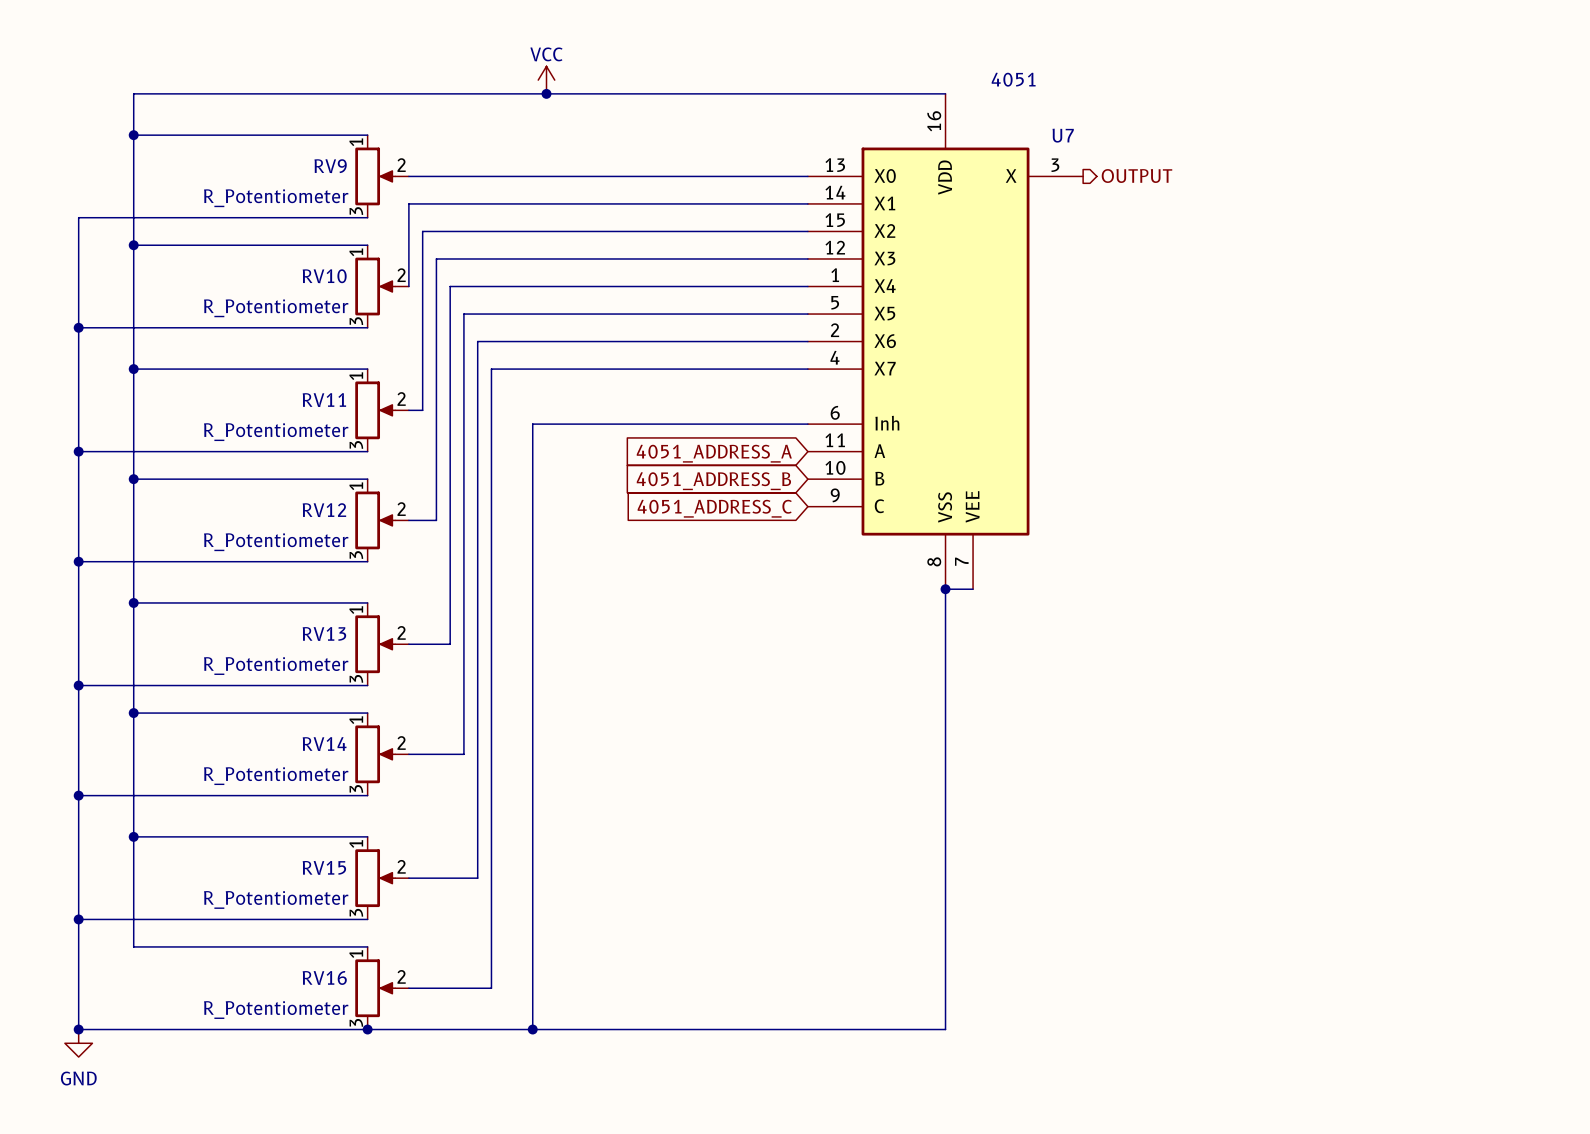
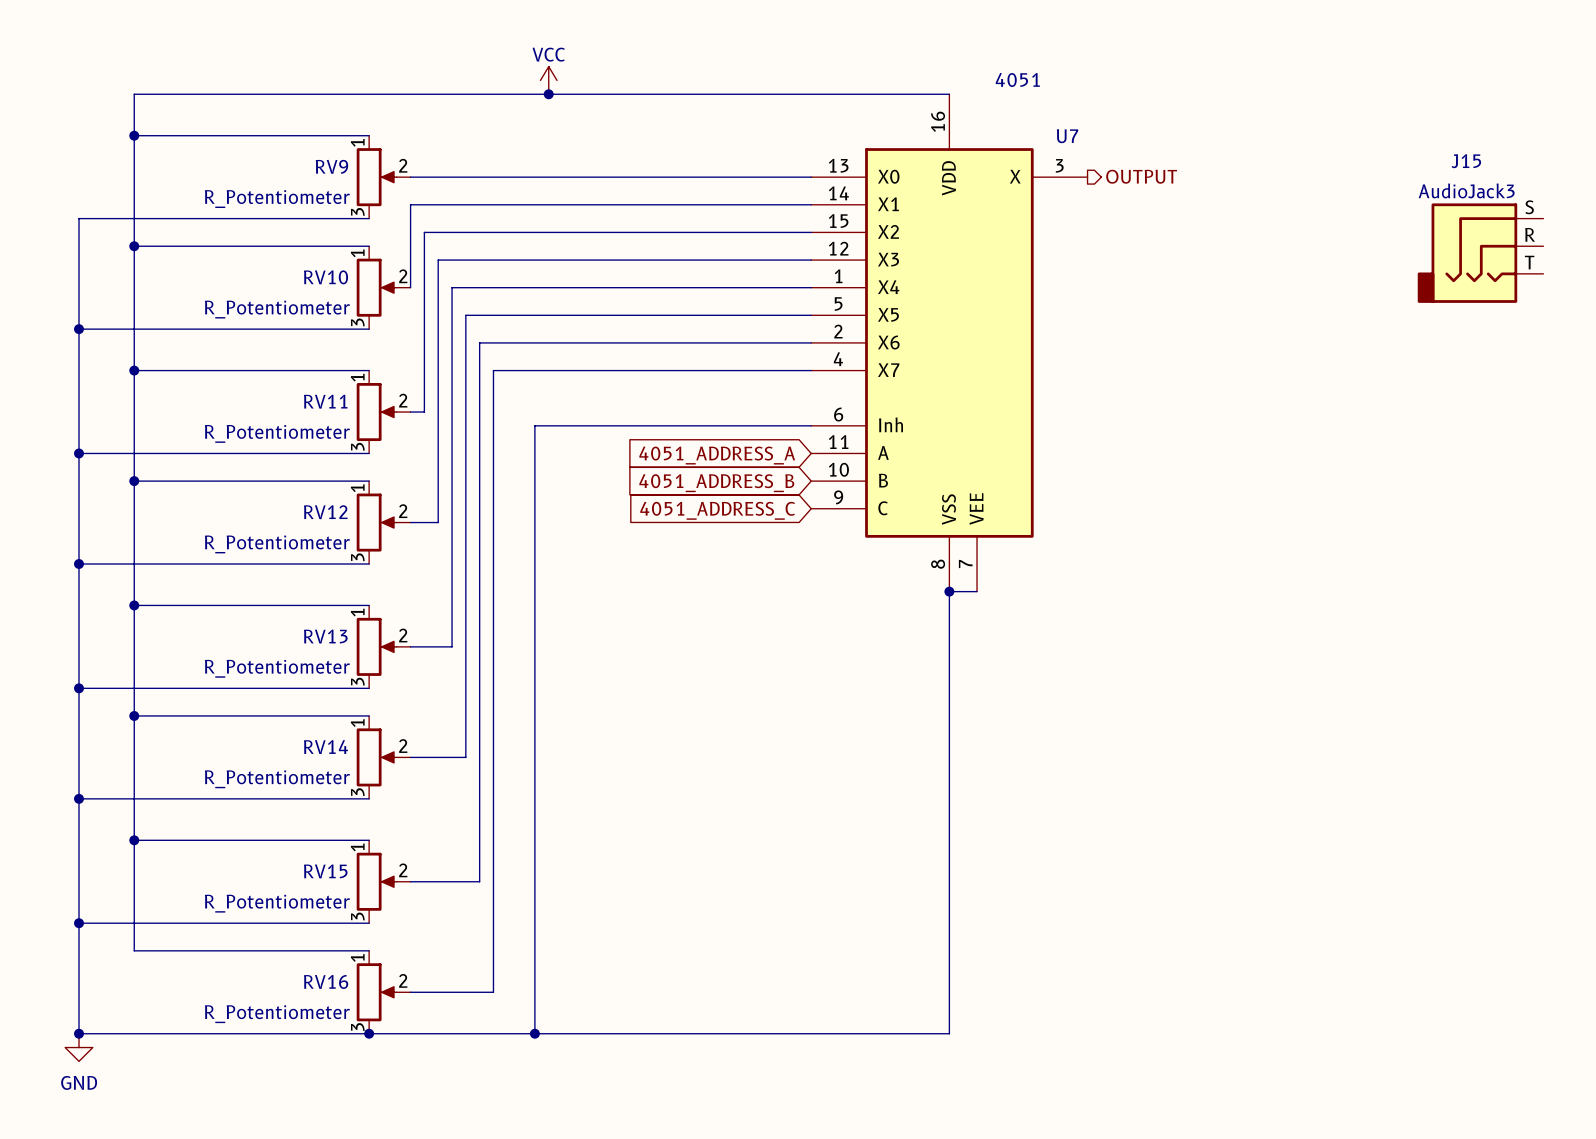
J15: none -> AudioJack3 (1480, 253)

